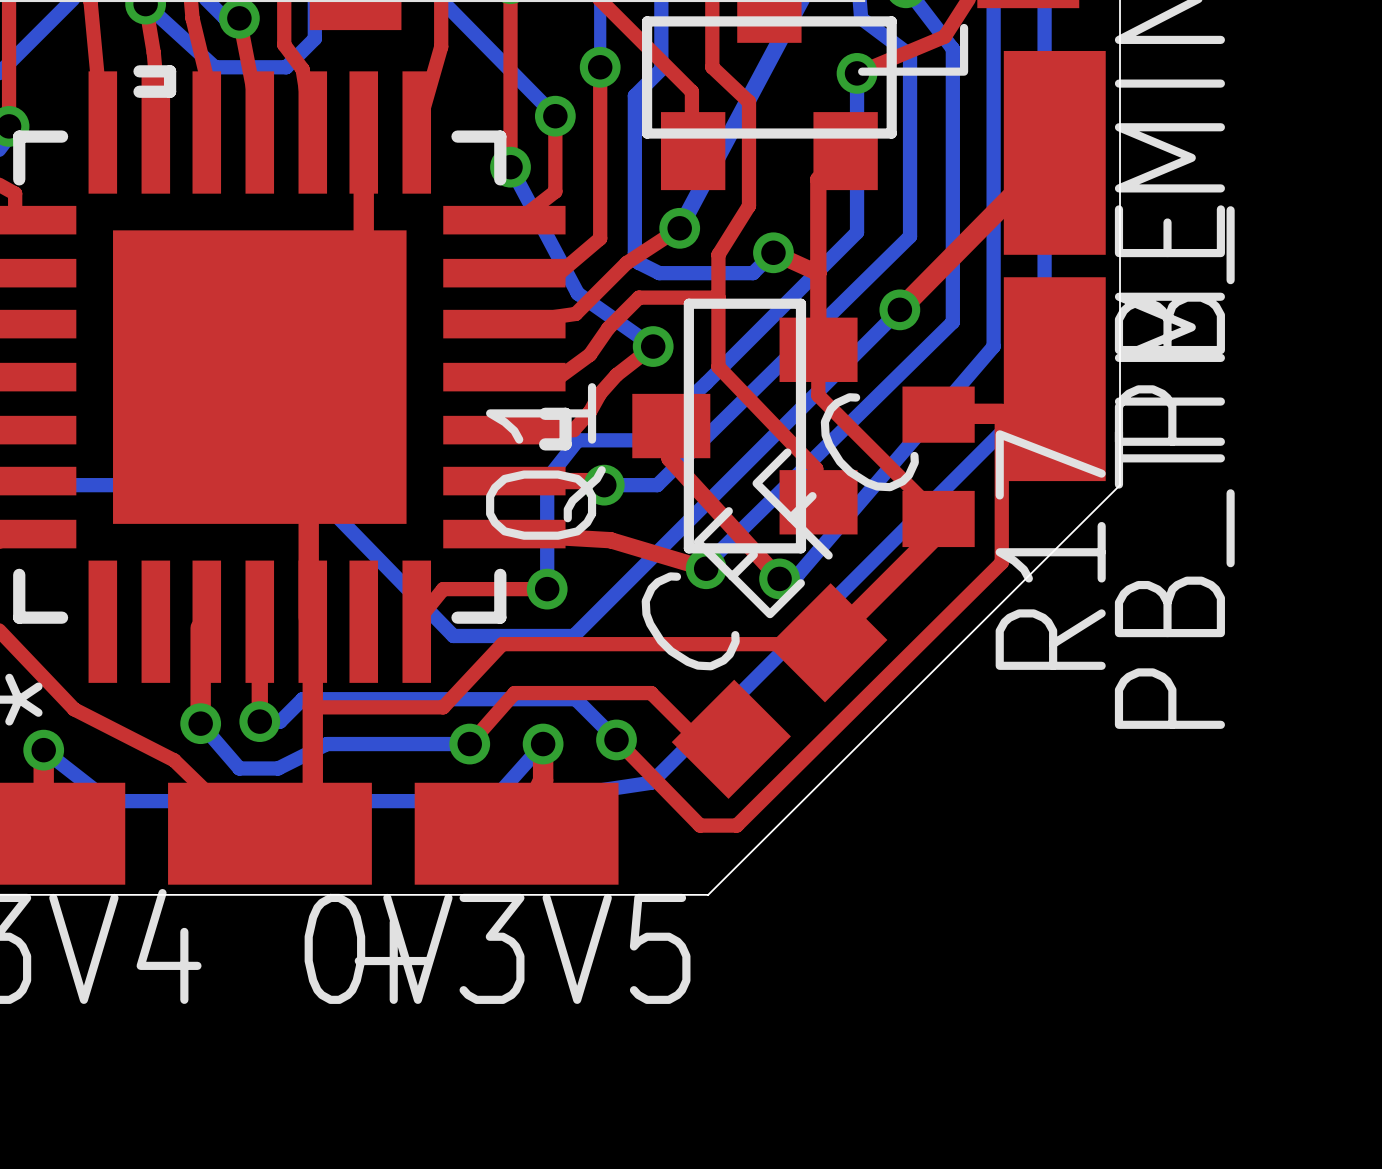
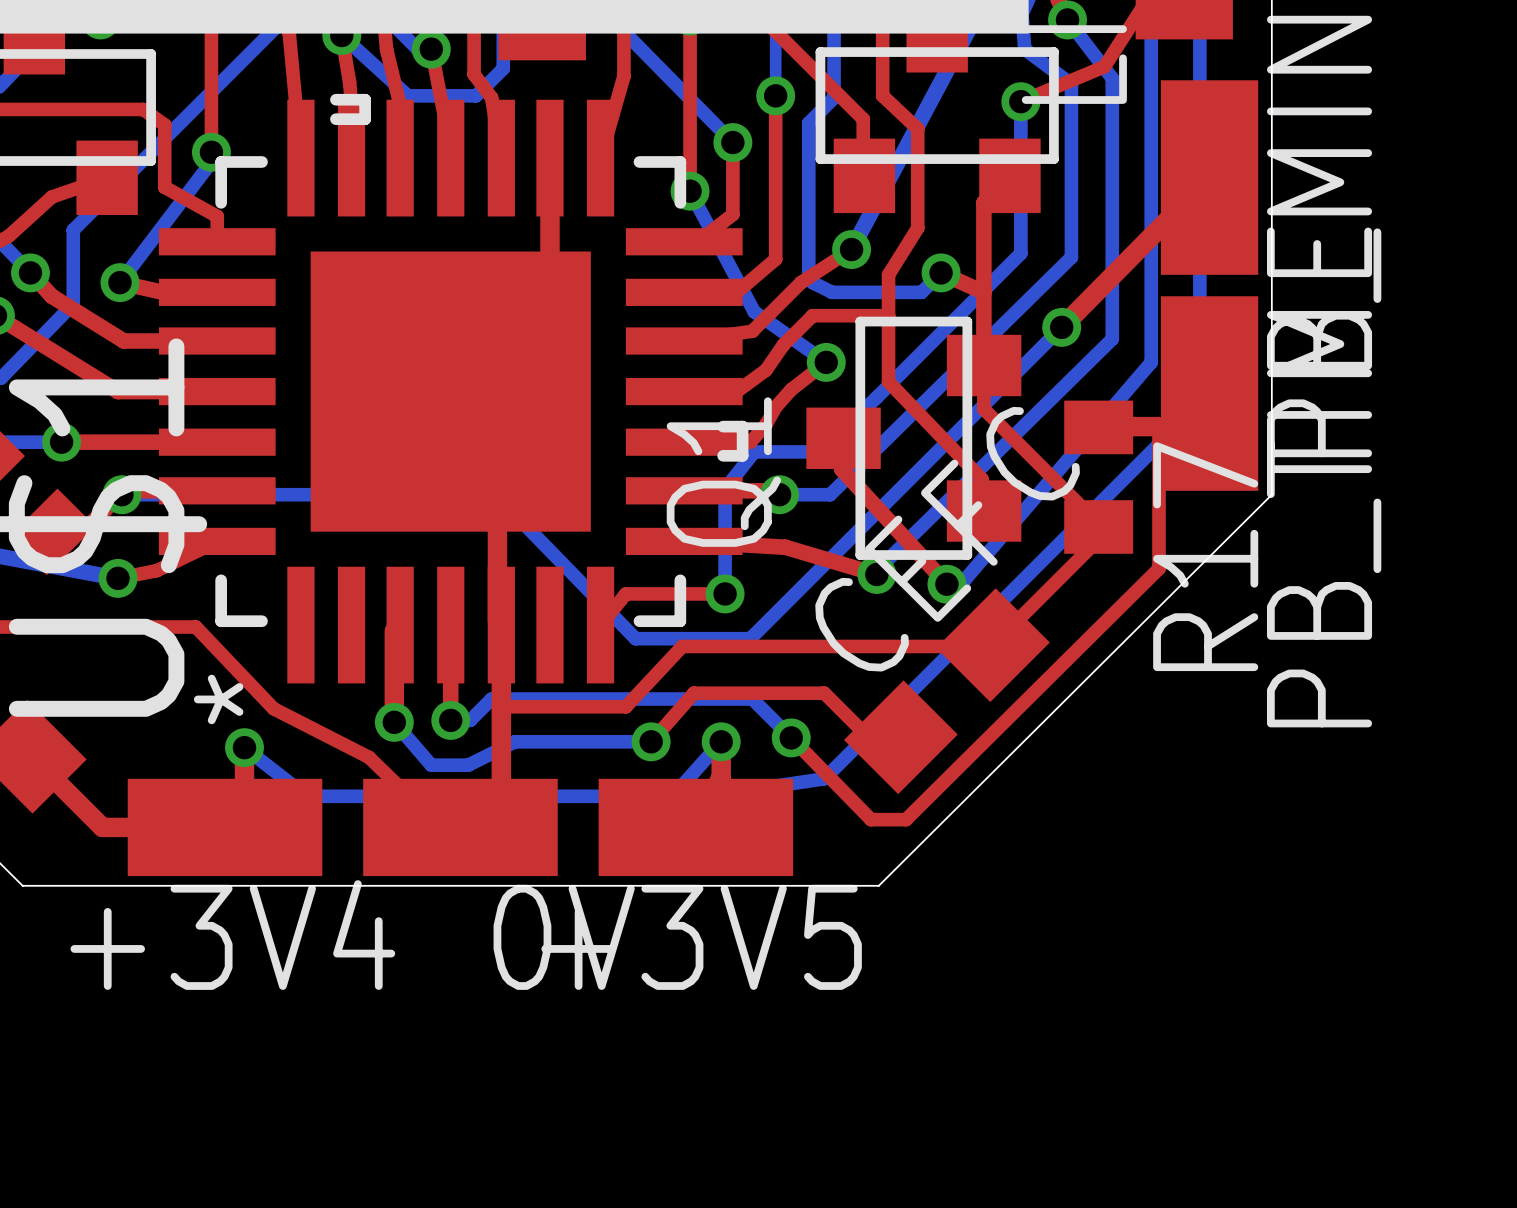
top track width: thick (938, 532) (827, 642) -> thin (1098, 539) (992, 645)

